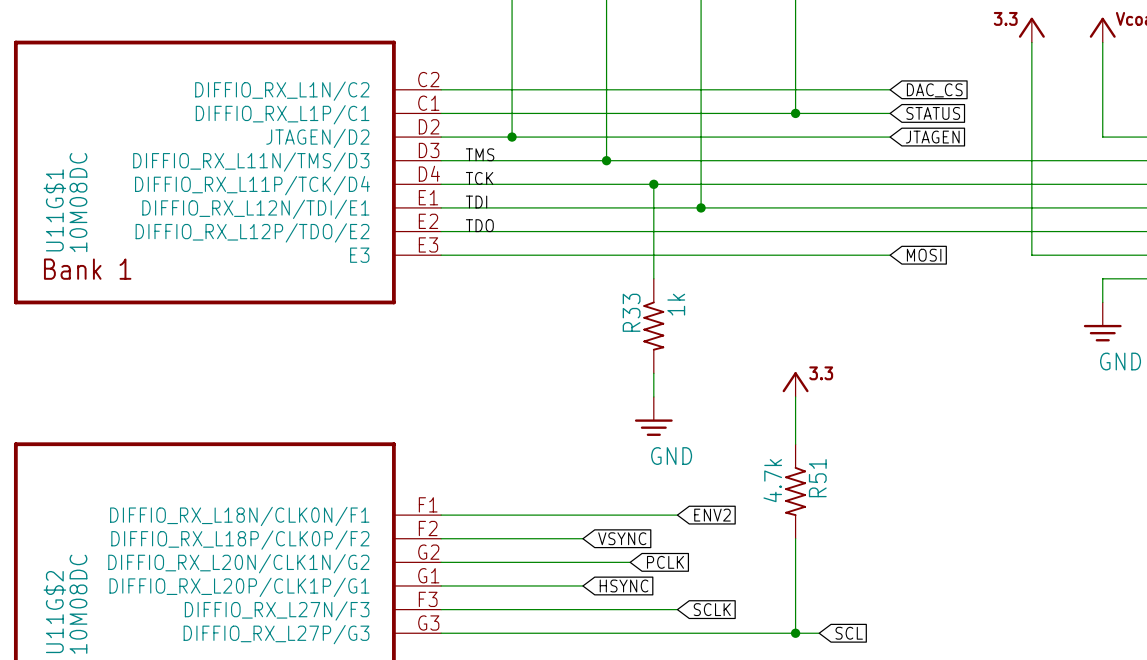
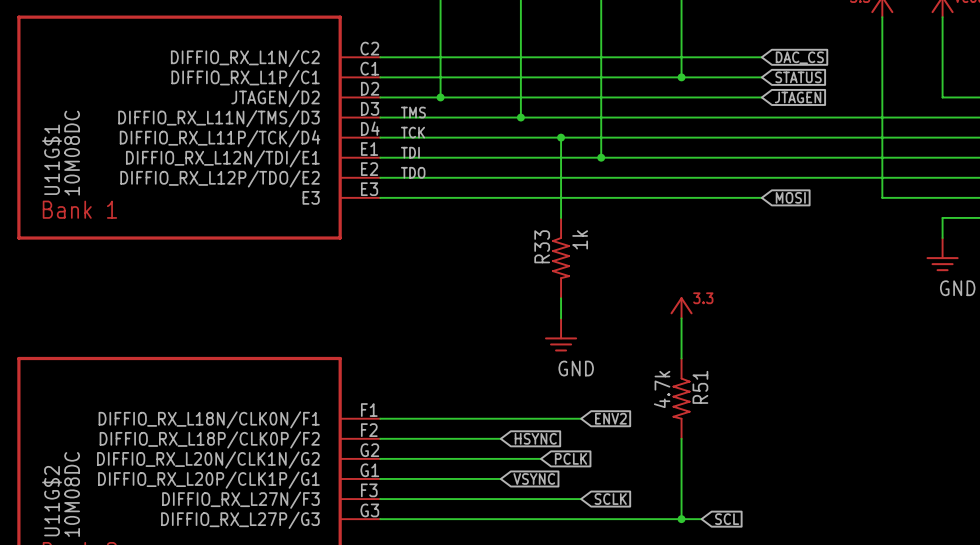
global label: VSYNC (622, 538) -> HSYNC (535, 438)
global label: HSYNC (624, 585) -> VSYNC (534, 478)

